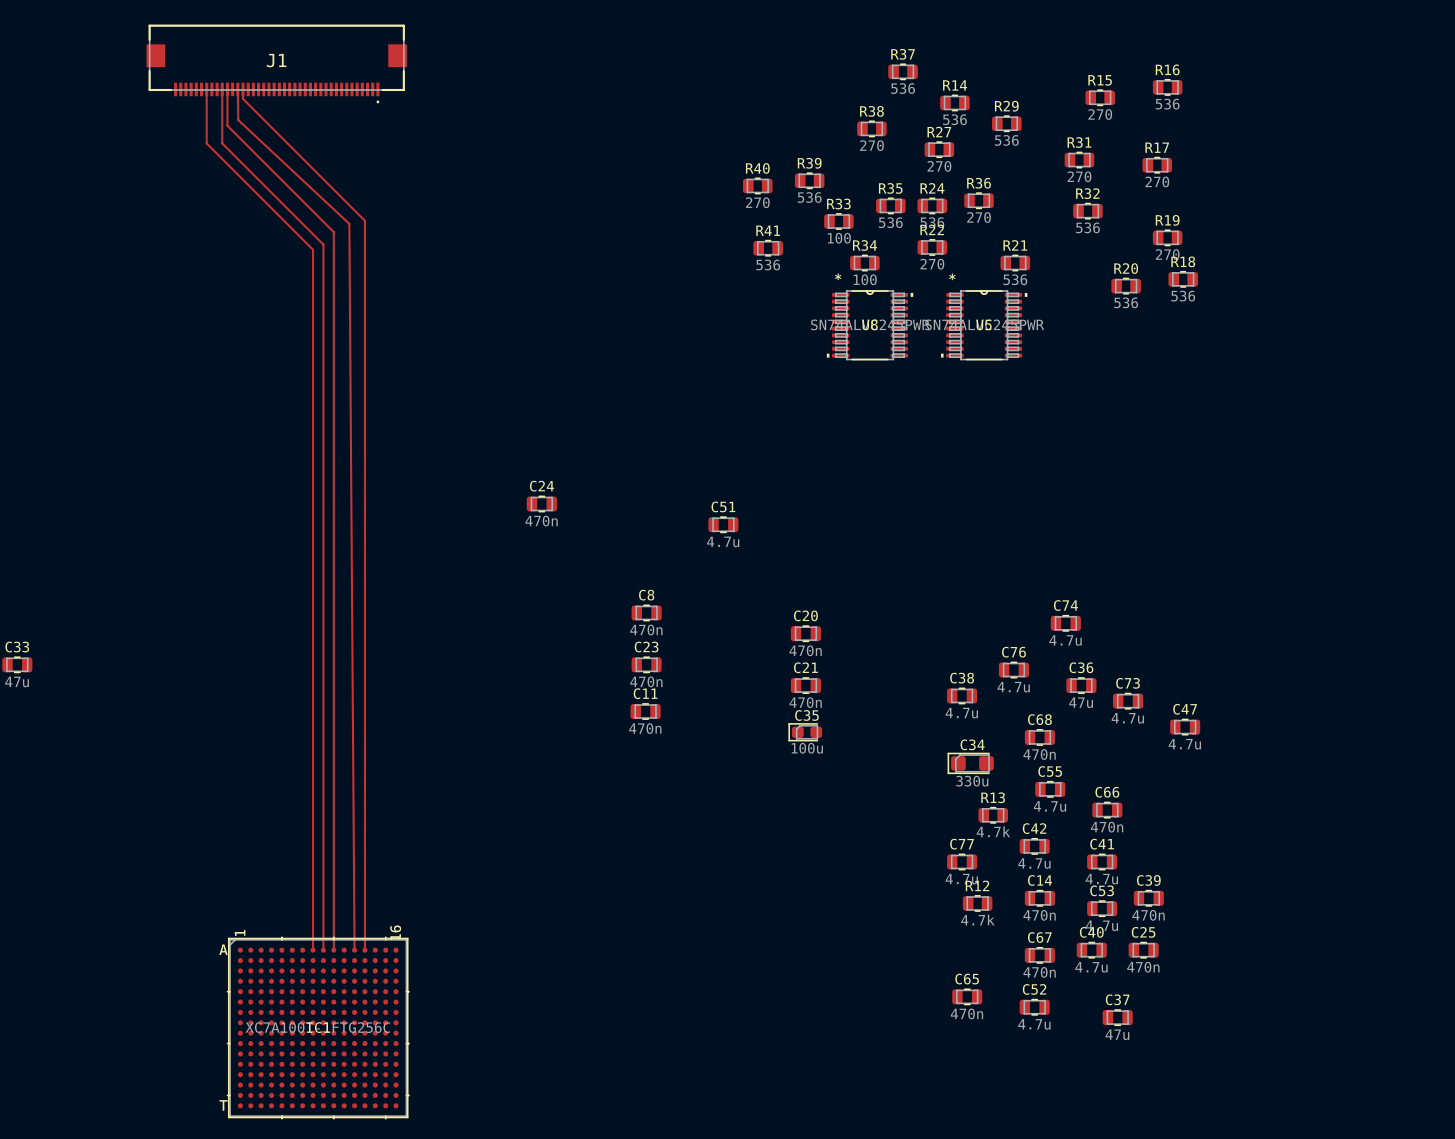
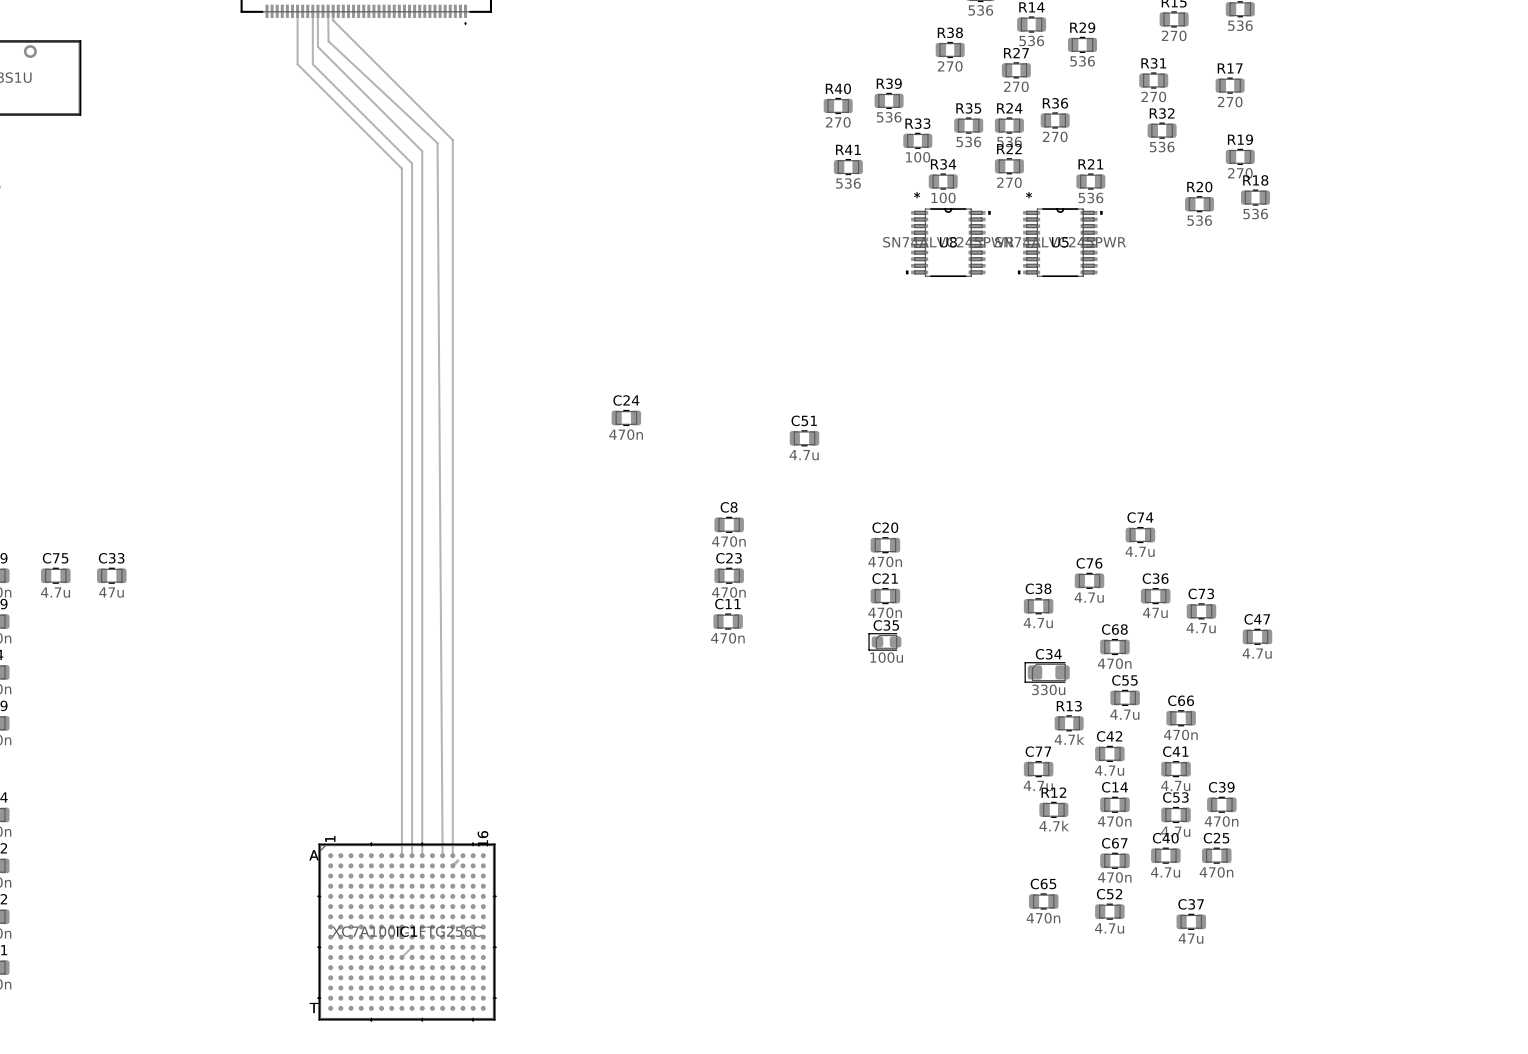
track: none -> (457, 860) (452, 865)
track: none -> (412, 947) (401, 957)

